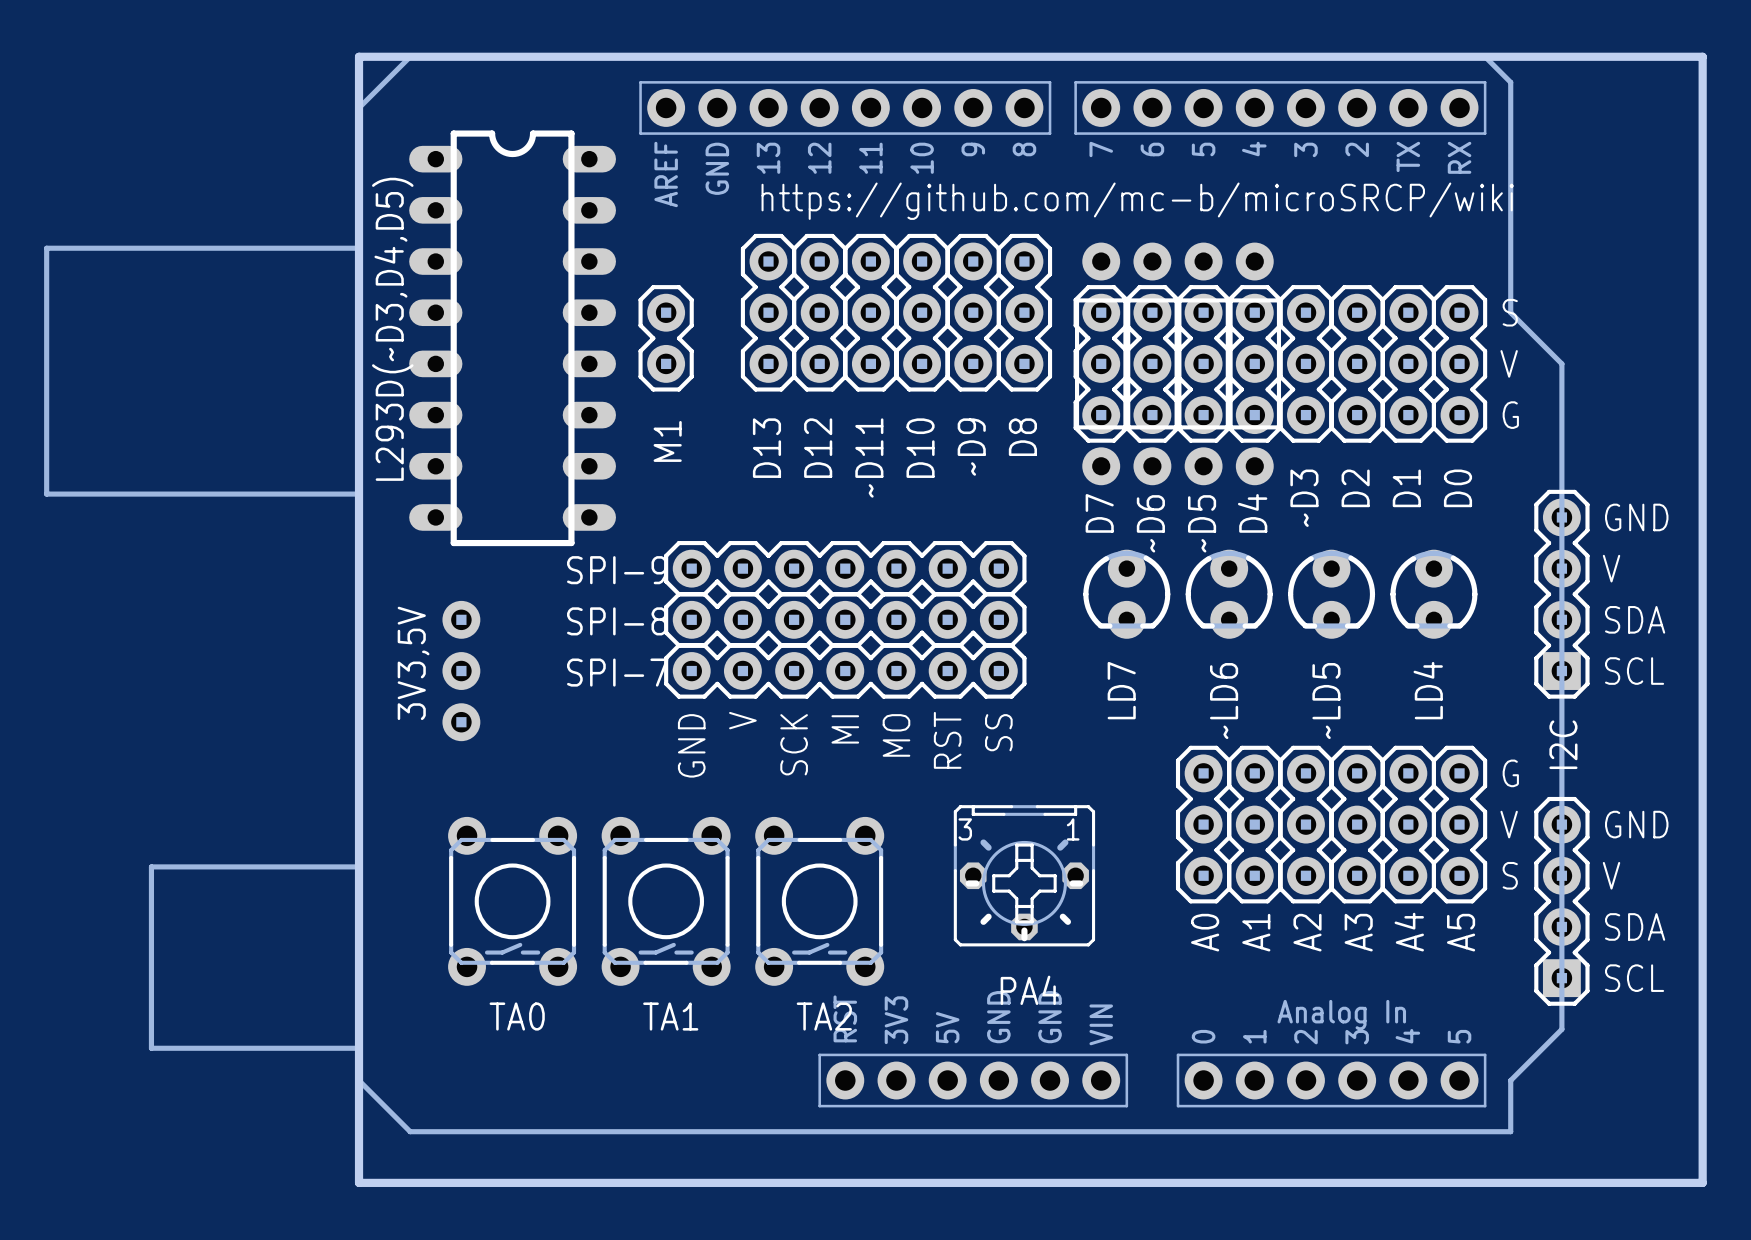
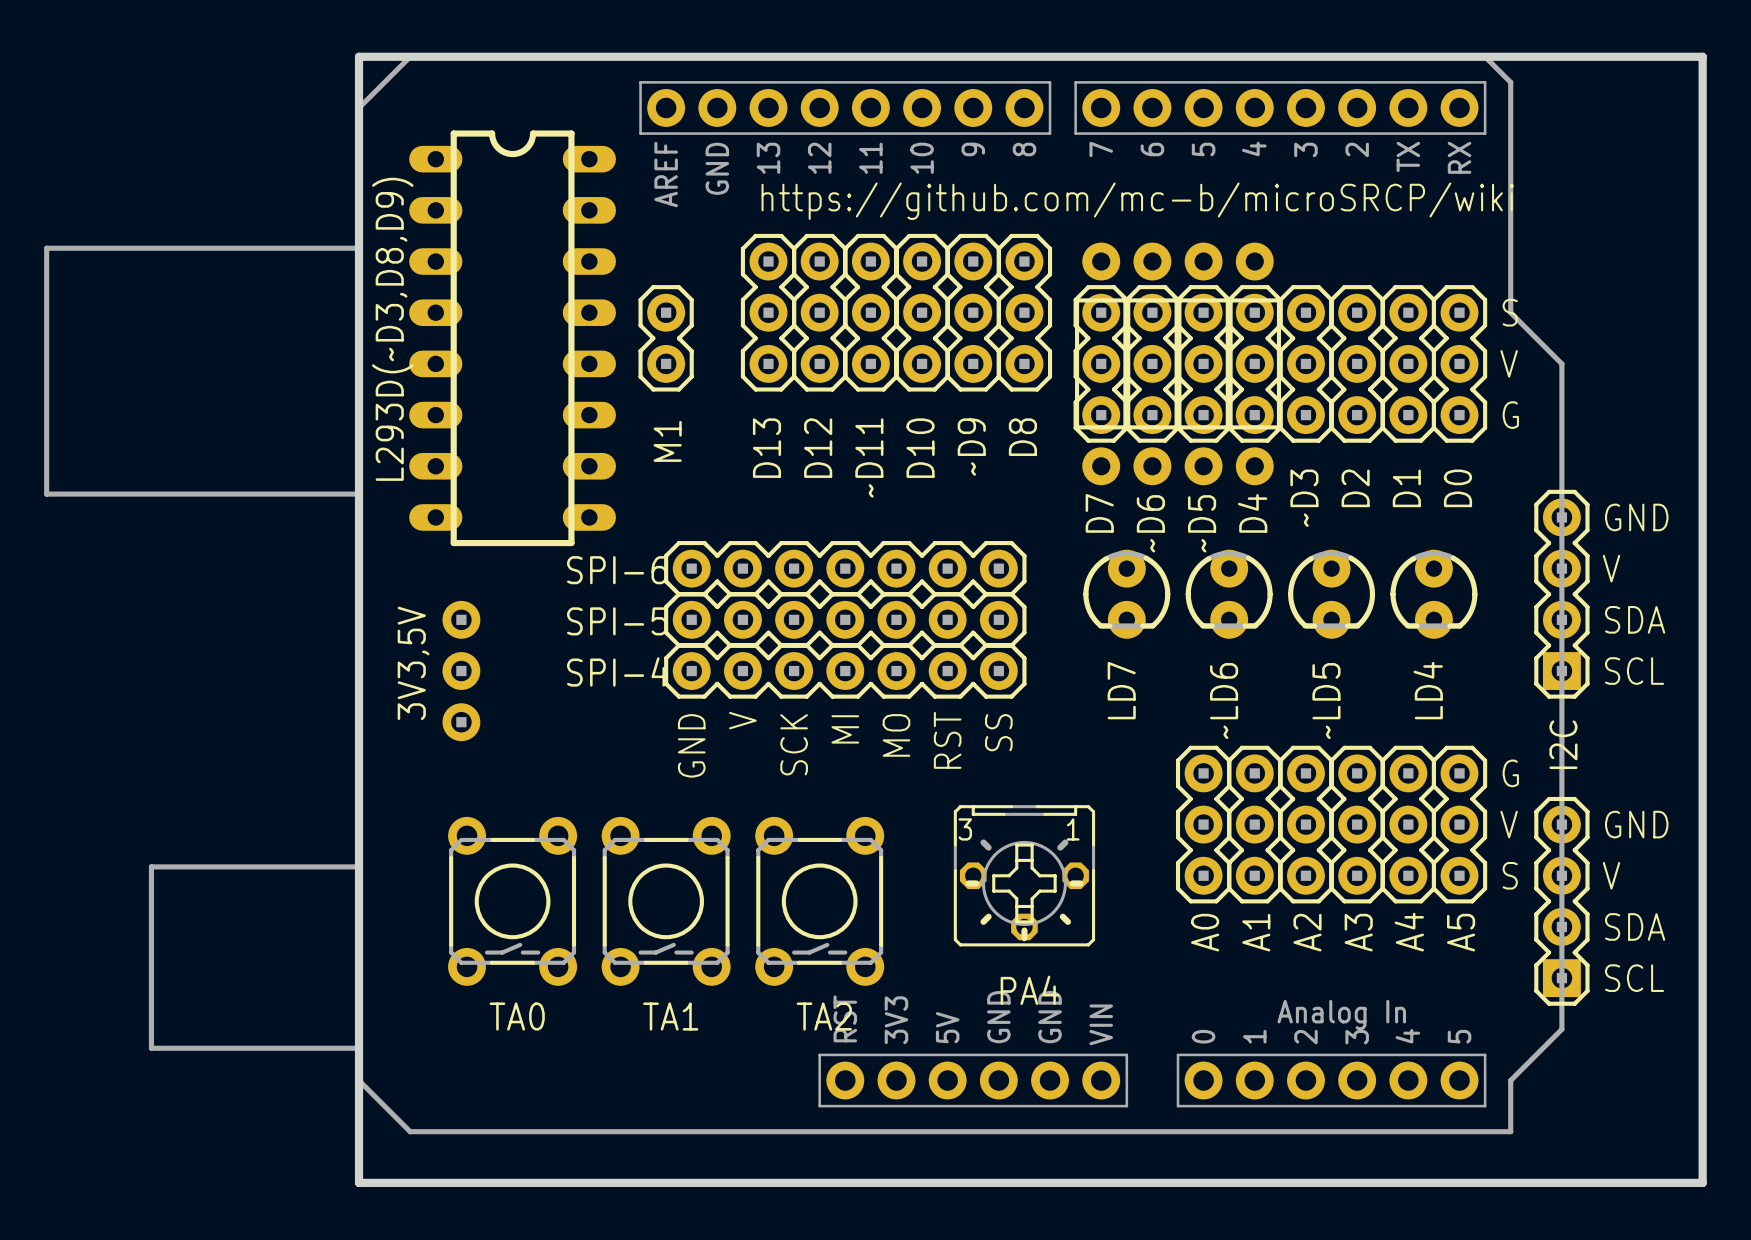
L293D(~D3,D4,D5) name: L293D(~D3,D4,D5) (392, 329) -> L293D(~D3,D8,D9) (392, 329)
SPI-9 name: SPI-9 (617, 570) -> SPI-6 (617, 570)
SPI-8 name: SPI-8 (617, 621) -> SPI-5 (617, 621)
SPI-7 name: SPI-7 (617, 672) -> SPI-4 (617, 671)

